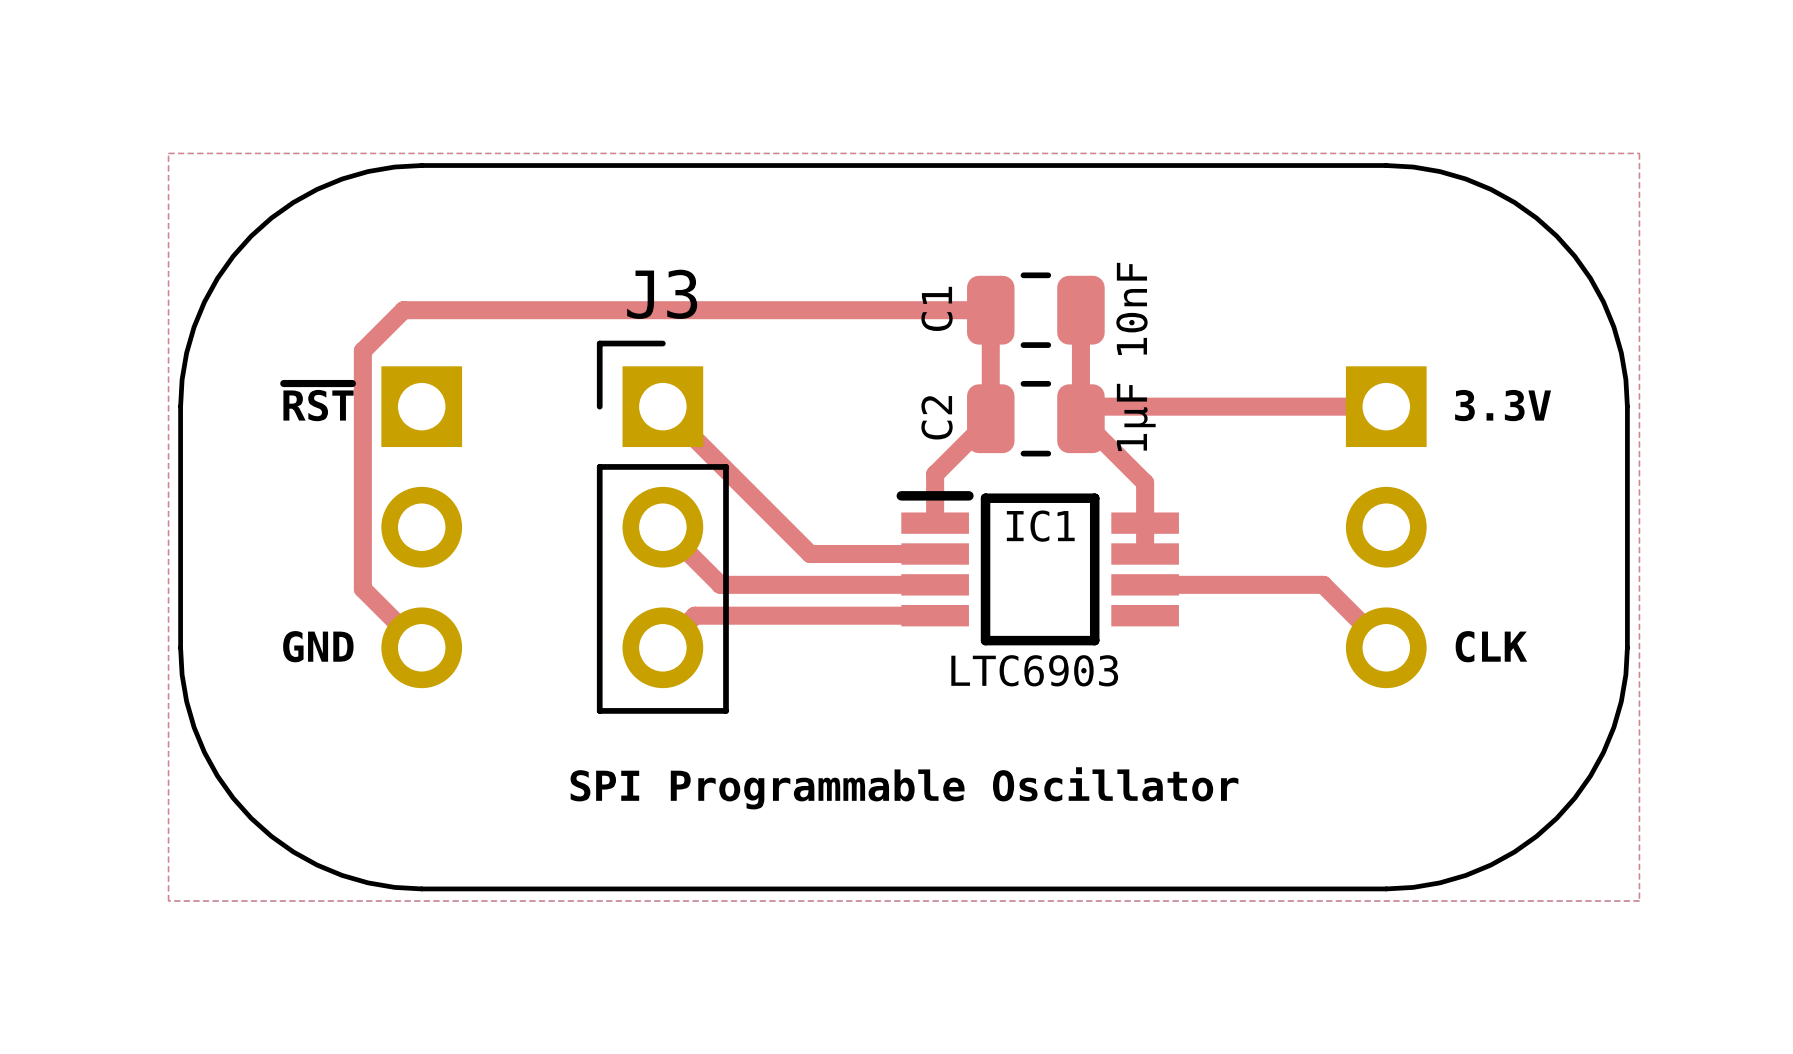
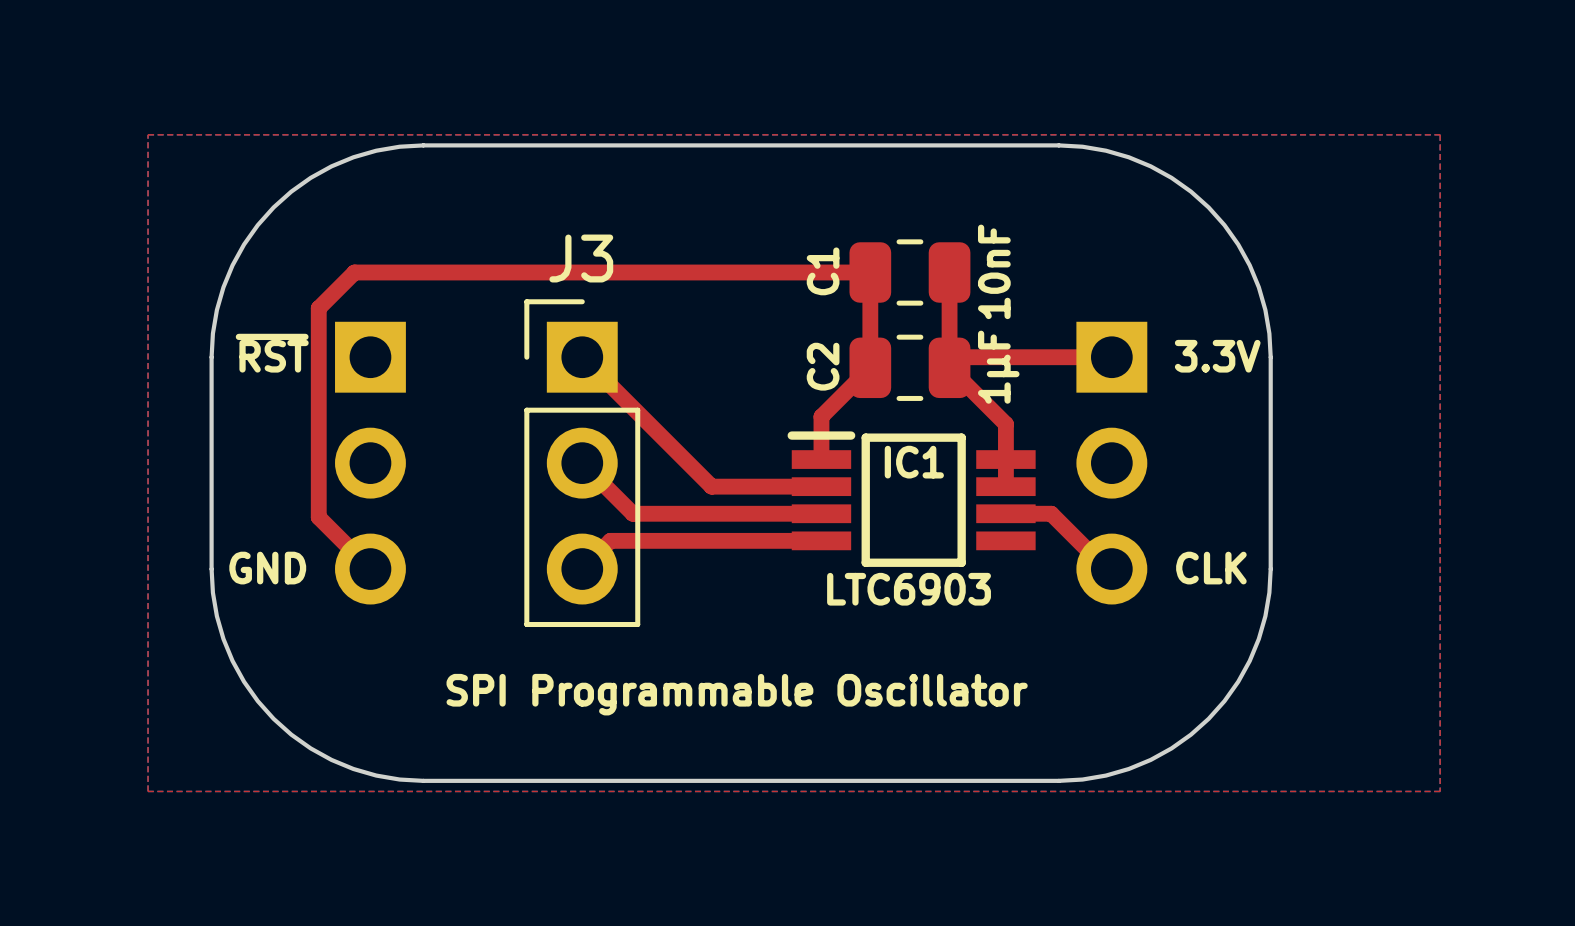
board edge: (482, 165) (394, 167) (368, 171) (342, 179) (317, 189) (293, 202) (271, 218) (251, 236) (233, 256) (217, 278) (204, 302) (194, 327) (186, 352) (182, 379) (180, 647) (182, 674) (186, 701) (194, 727) (204, 752) (217, 776) (233, 798) (251, 818) (271, 836) (293, 851) (317, 865) (342, 875) (368, 882) (394, 887) (421, 888) (482, 888) -> (423, 145) (376, 150) (353, 157) (310, 177) (291, 191) (257, 225) (232, 265) (216, 310) (212, 333) (211, 569) (216, 616) (232, 660) (244, 681) (273, 718) (291, 734) (331, 759) (376, 775) (423, 780)
board edge: (1205, 165) (1413, 167) (1439, 171) (1465, 179) (1490, 189) (1514, 202) (1536, 218) (1556, 236) (1574, 256) (1590, 278) (1603, 302) (1613, 327) (1621, 352) (1625, 379) (1627, 406) (1625, 674) (1621, 701) (1613, 727) (1603, 752) (1590, 776) (1574, 798) (1556, 818) (1536, 836) (1514, 851) (1490, 865) (1465, 875) (1439, 882) (1413, 887) (1386, 888) (1205, 888) -> (1058, 145) (1106, 150) (1128, 157) (1171, 177) (1208, 207) (1238, 244) (1249, 265) (1265, 310) (1270, 357) (1269, 592) (1265, 616) (1249, 660) (1224, 701) (1190, 734) (1171, 748) (1150, 759) (1106, 775) (1058, 780)
text position: 3.3V (1503, 405) -> 3.3V (1217, 356)
top track: (1265, 406) (1386, 406) -> none
part position: (1386, 527) -> (1111, 463)
top track: (1196, 584) (1323, 584) (1386, 647) -> (1051, 513) (1106, 569) (1111, 569)
text position: CLK (1491, 646) -> CLK (1211, 568)
text position: SPI Programmable Oscillator (904, 788) -> SPI Programmable Oscillator (737, 694)

